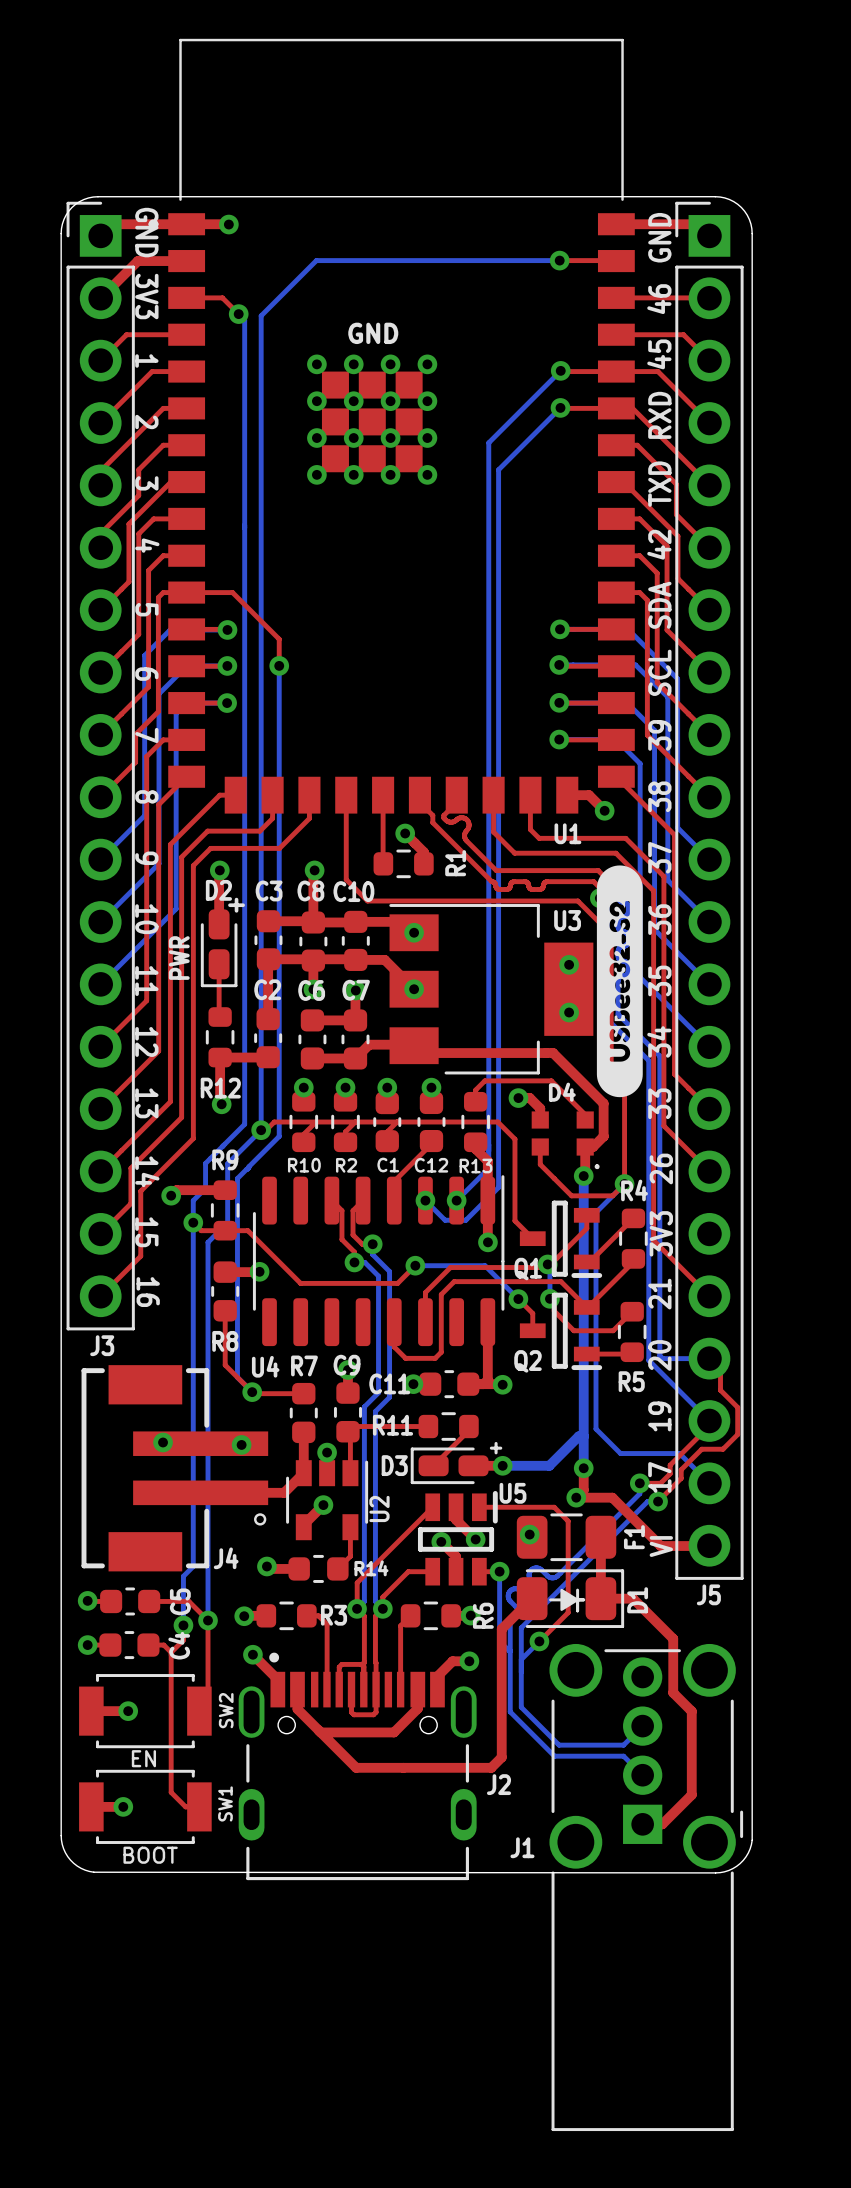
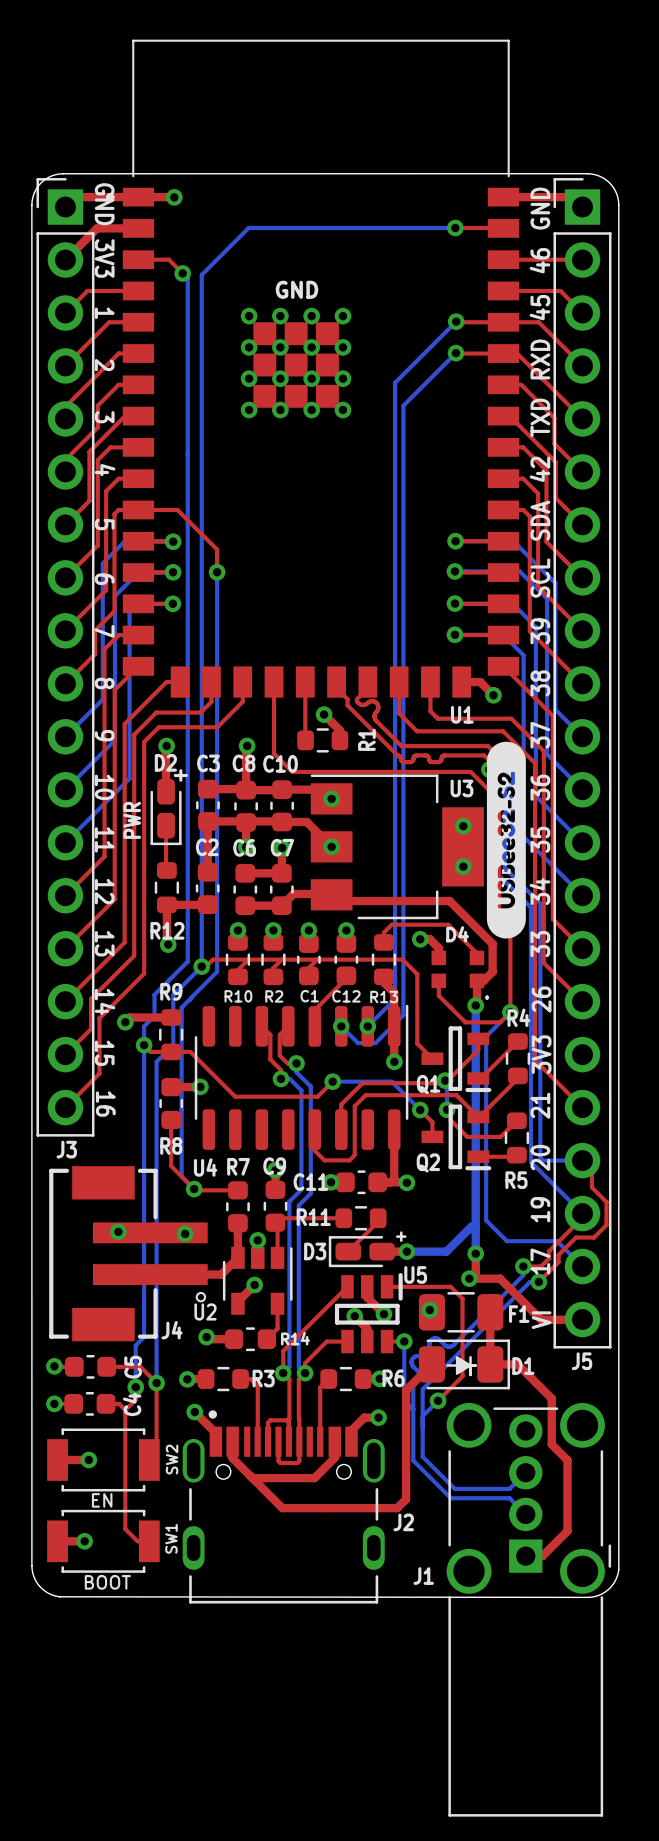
U2 name rotation: 0° (379, 1508) -> 90° clockwise (205, 1311)
U2 name position: U2 (379, 1508) -> U2 (205, 1311)
F1 name rotation: 0° (634, 1537) -> 90° clockwise (519, 1314)
D1 name rotation: 0° (637, 1600) -> 90° clockwise (523, 1366)
R6 name rotation: 0° (483, 1615) -> 90° clockwise (393, 1378)

